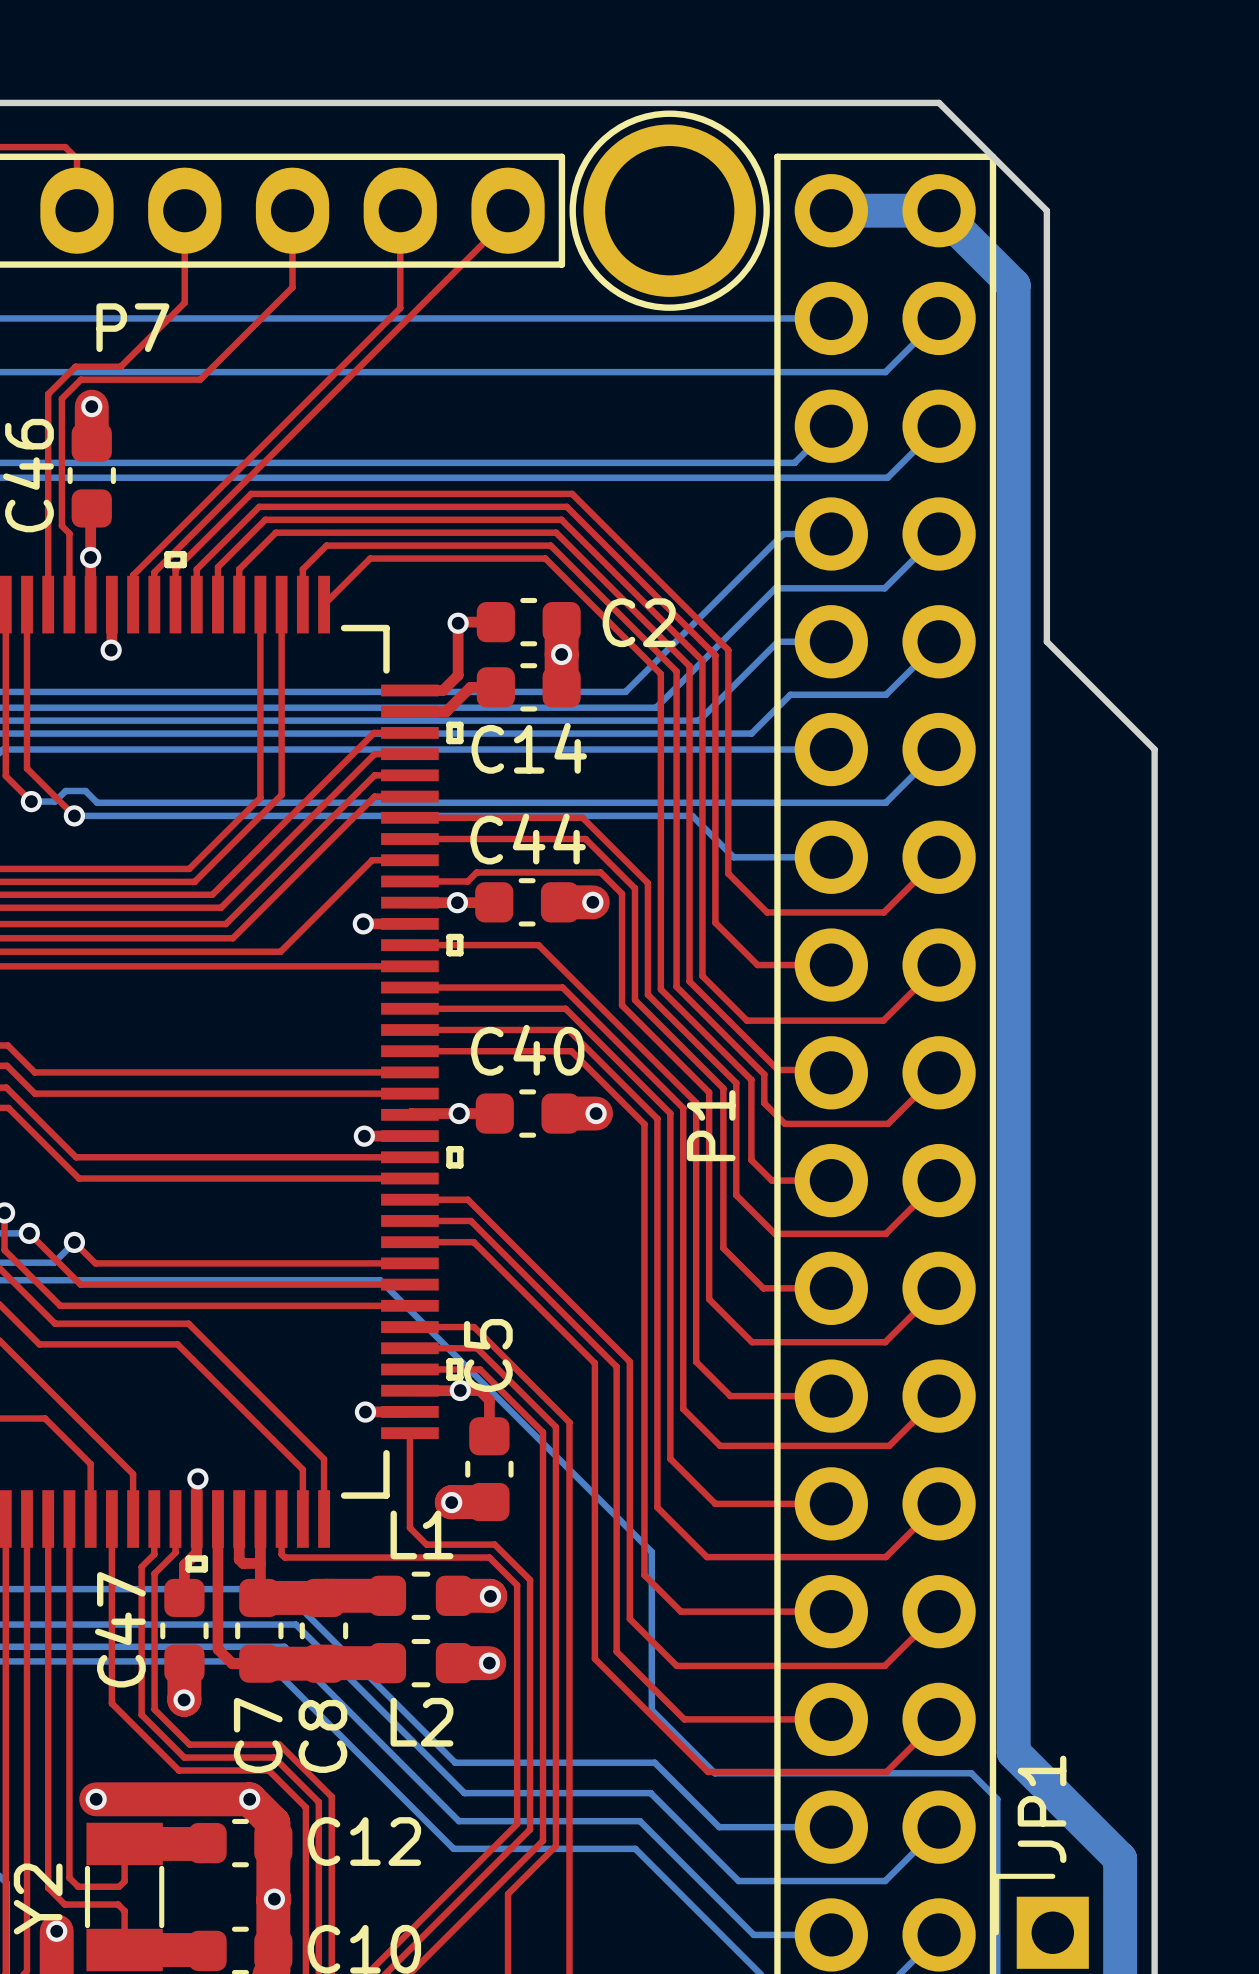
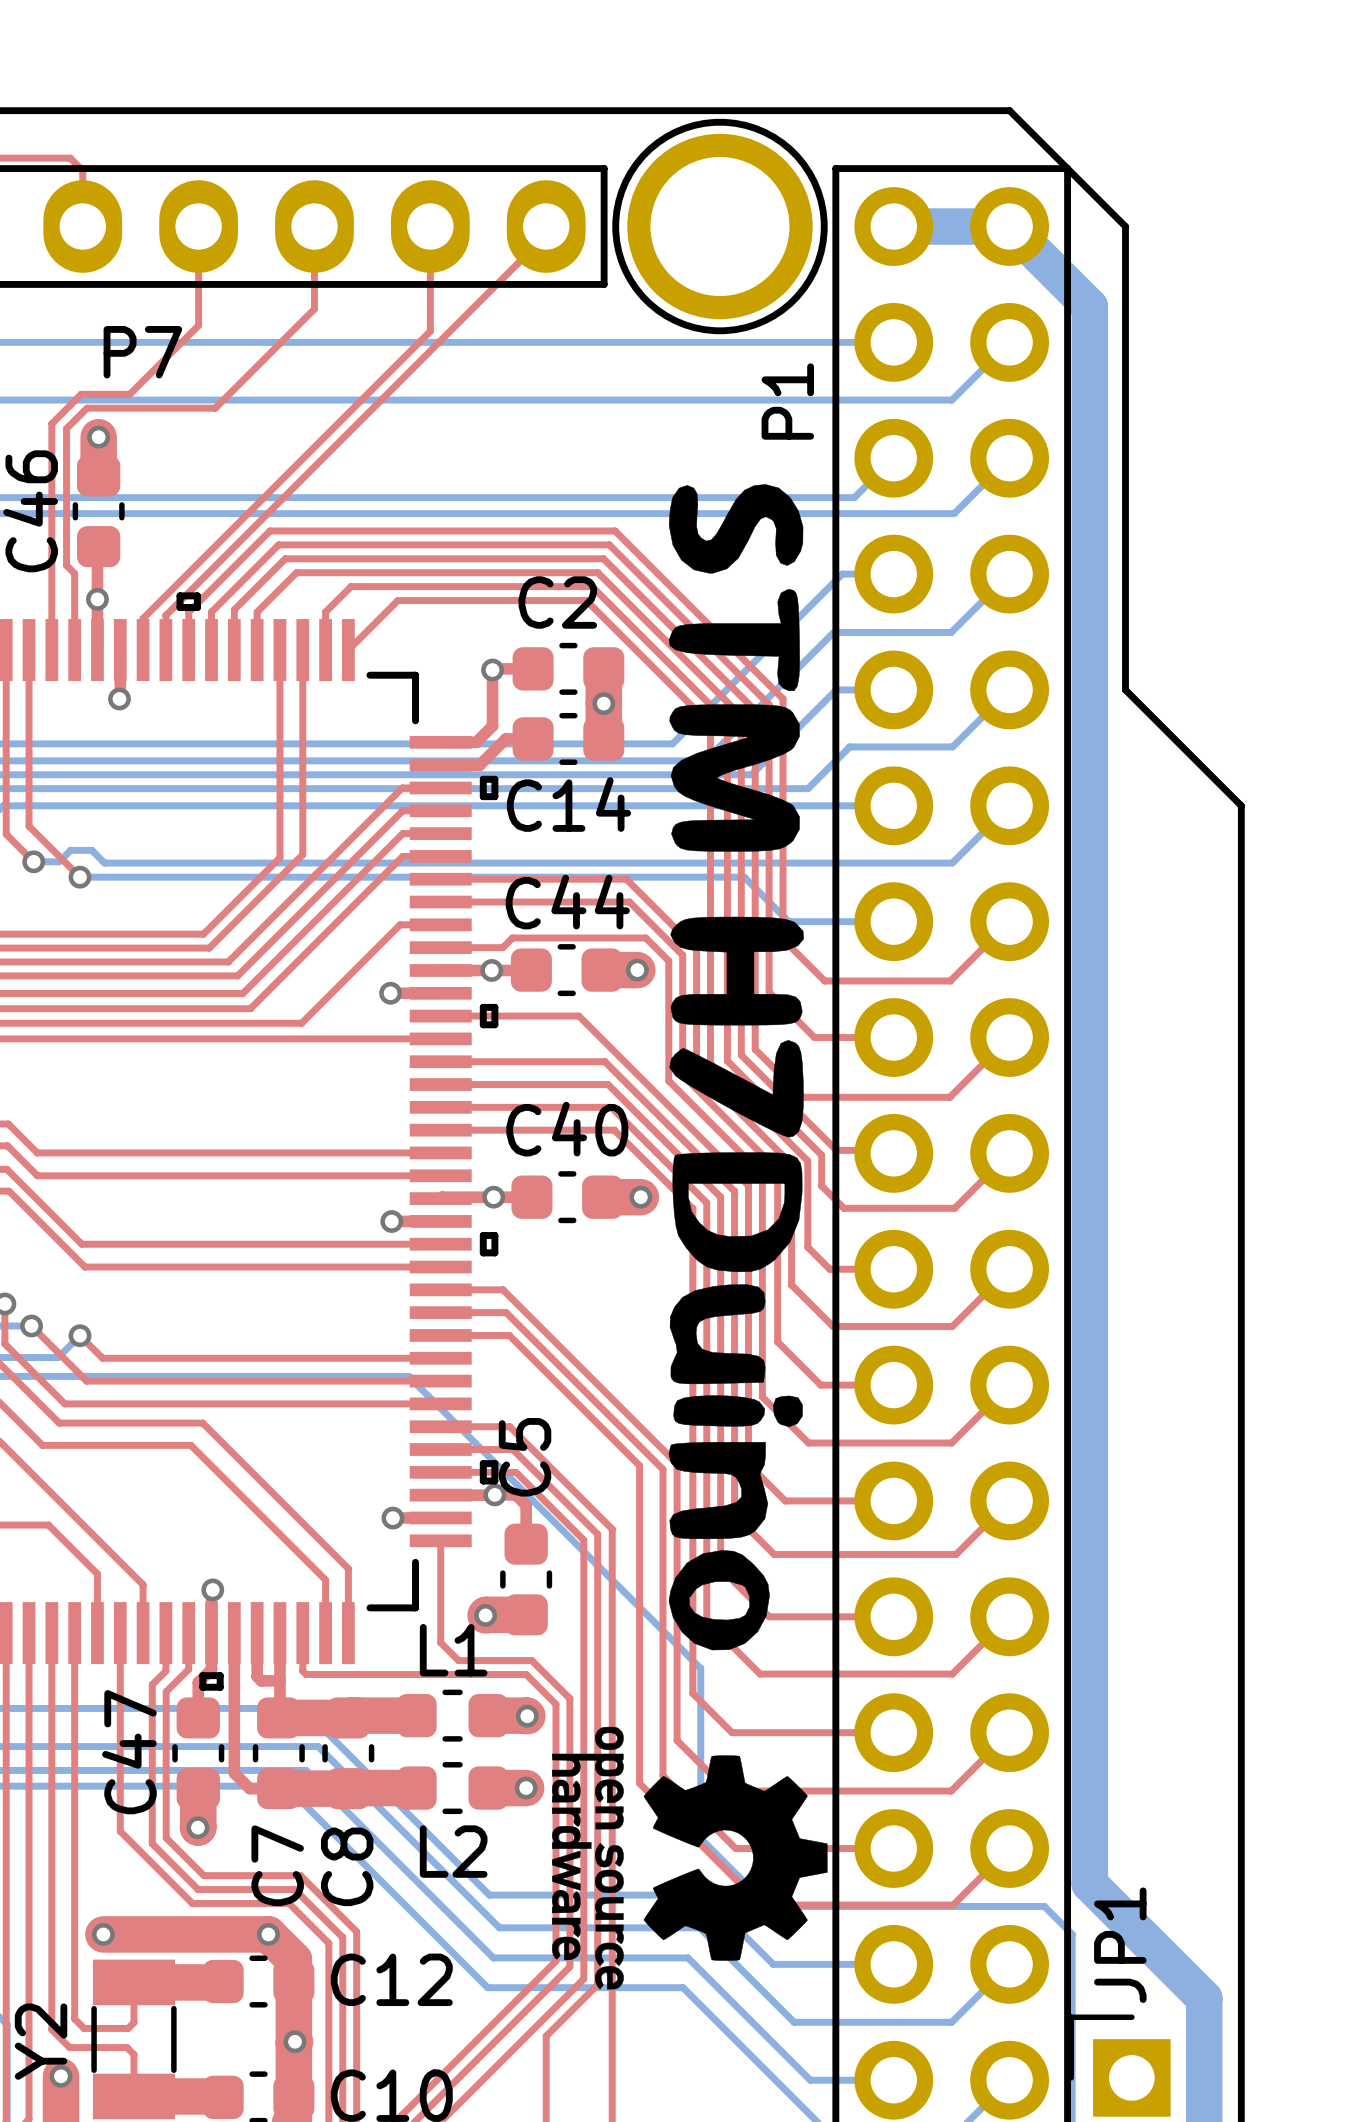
drawing: none -> [668, 484, 804, 1651]
C2 name position: C2 (639, 622) -> C2 (557, 602)
P1 name position: P1 (711, 1125) -> P1 (787, 401)
drawing: none -> [551, 1726, 828, 1990]

